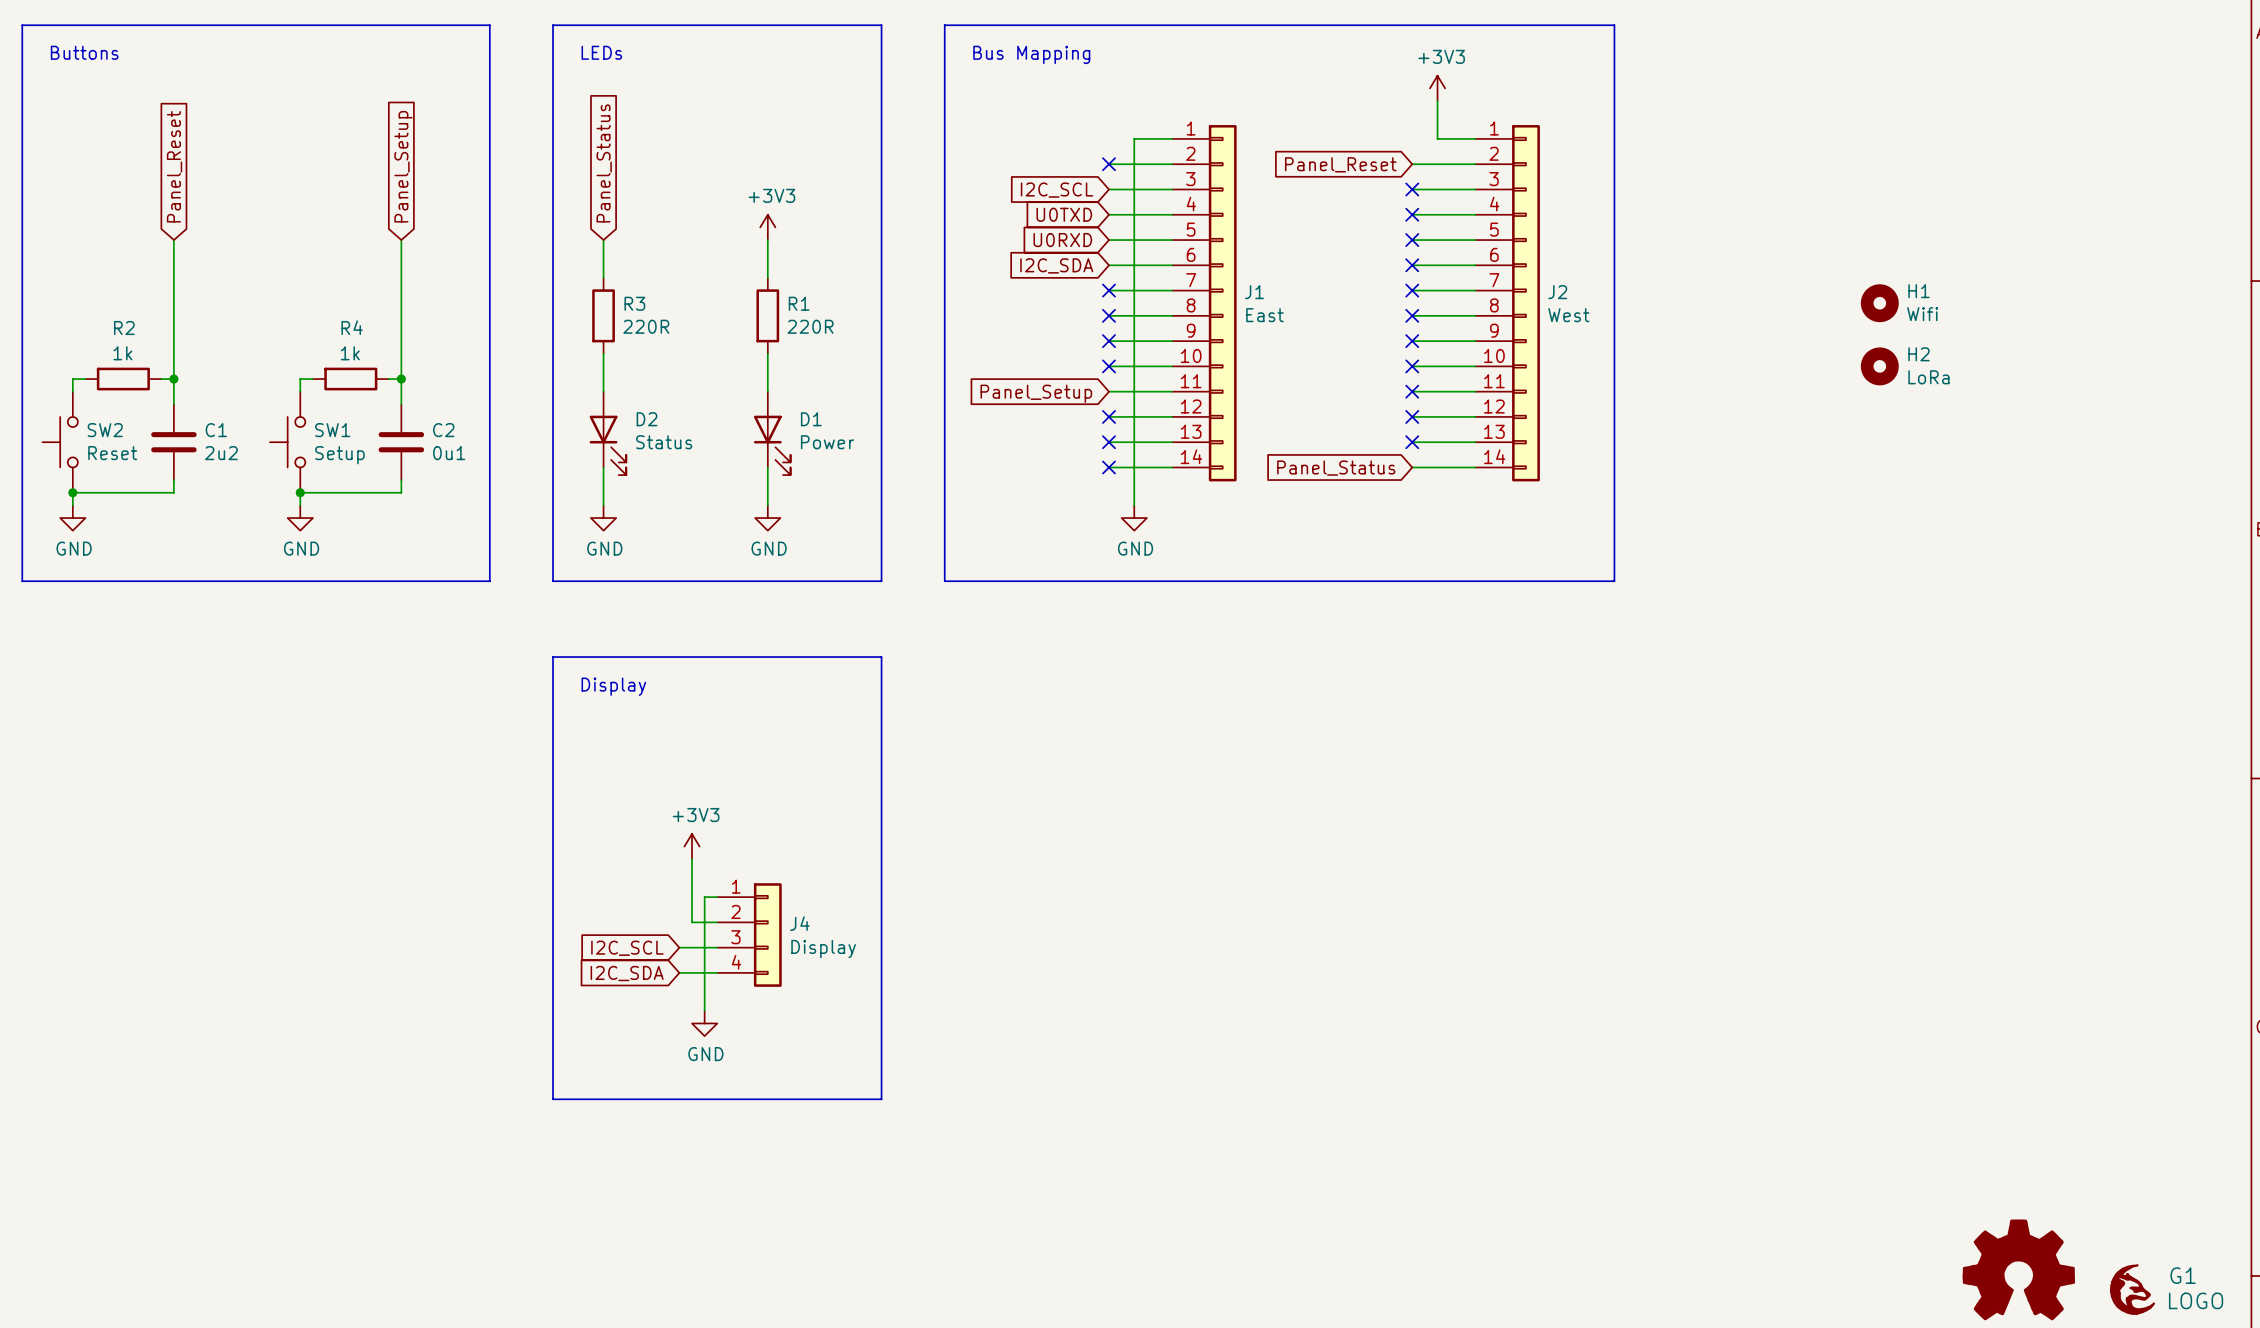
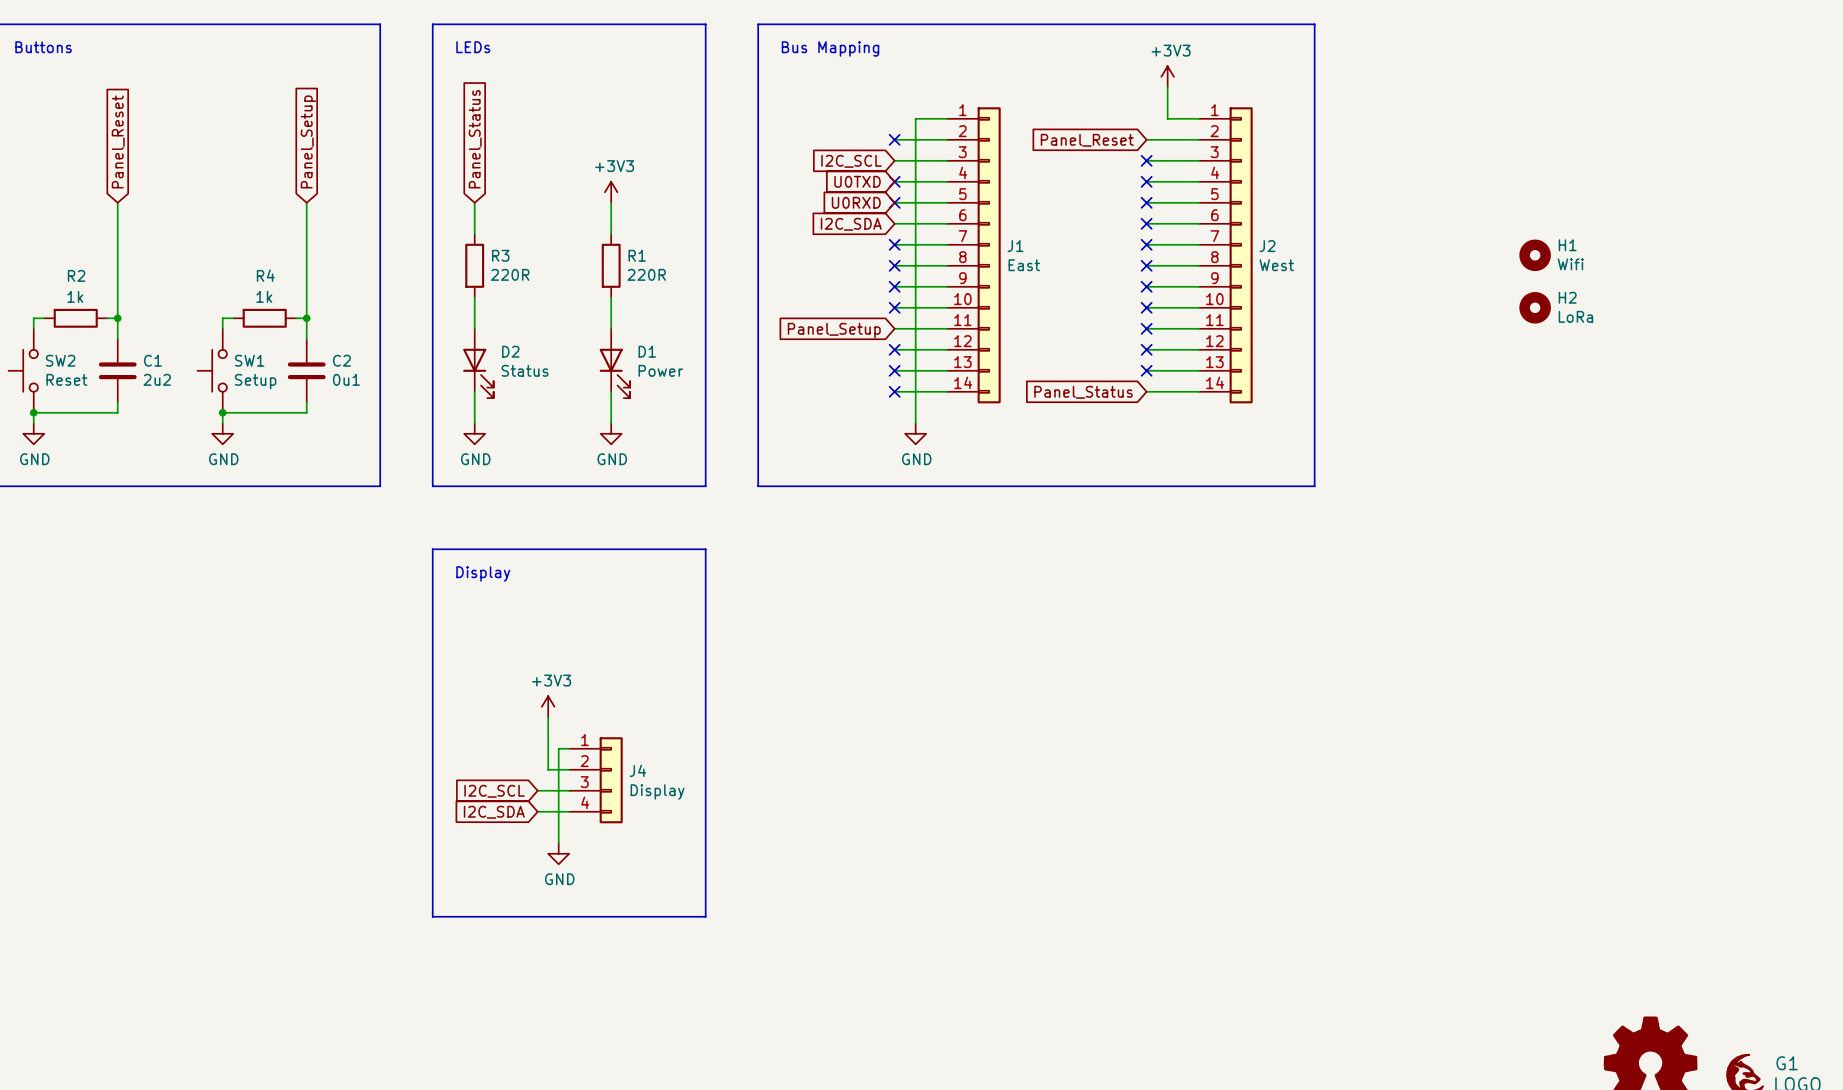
no-connect mark: none -> (894, 181)
no-connect mark: none -> (894, 202)

